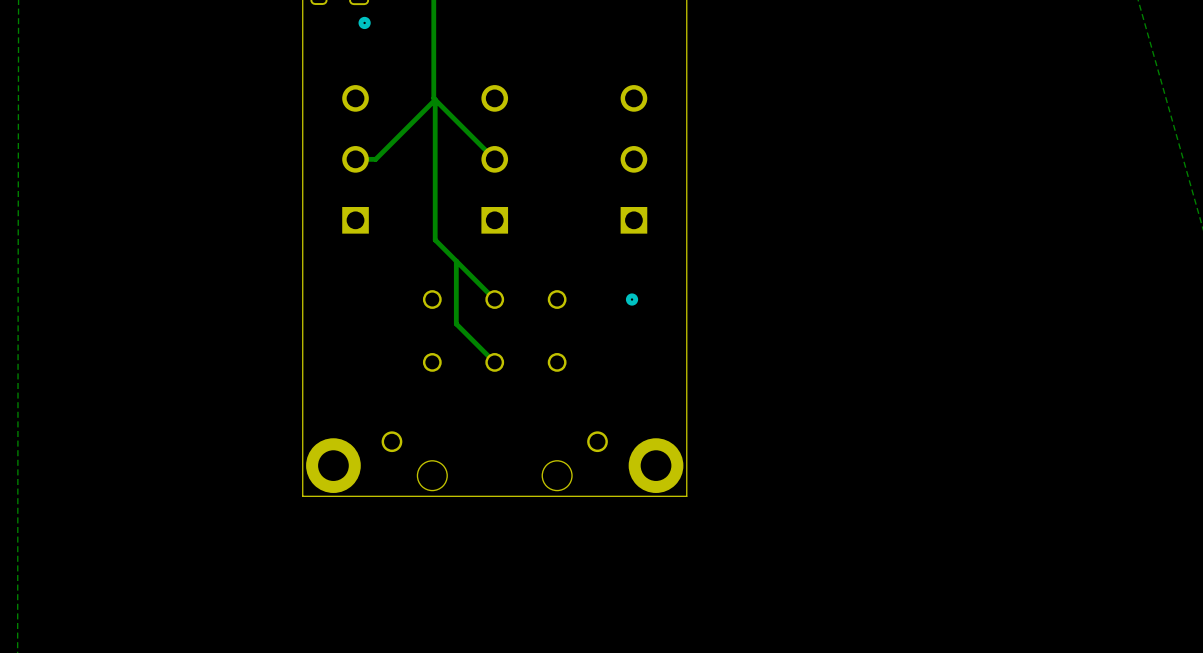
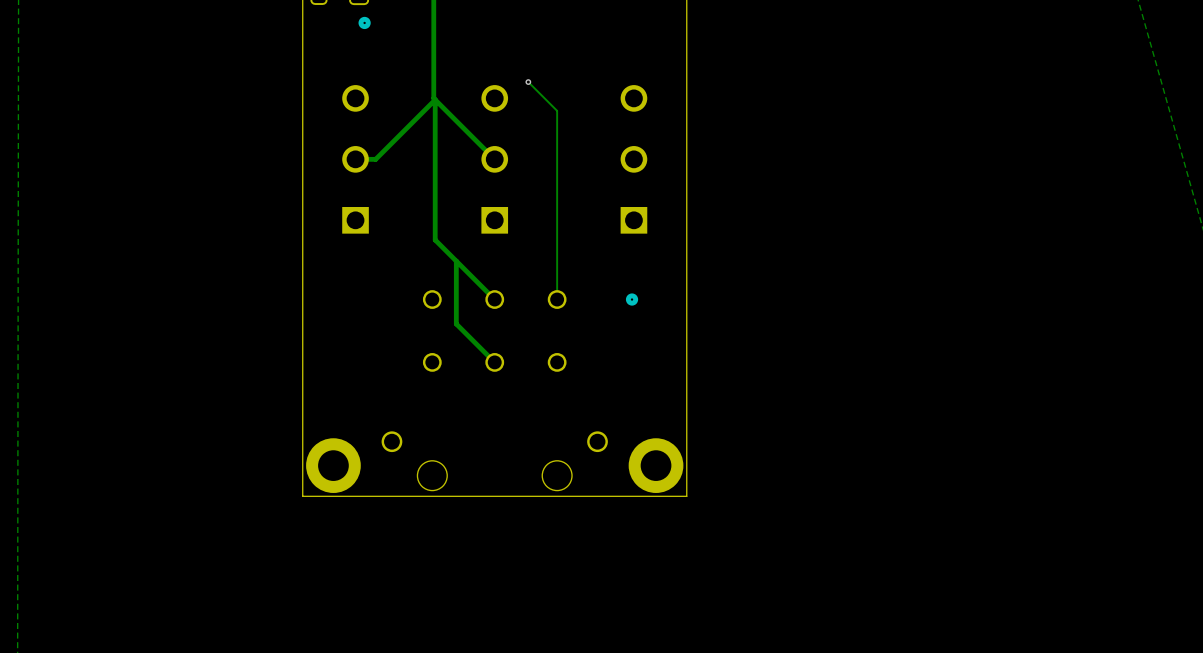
track: none -> (528, 82) (557, 110) (557, 299)
via: none -> (528, 82)

